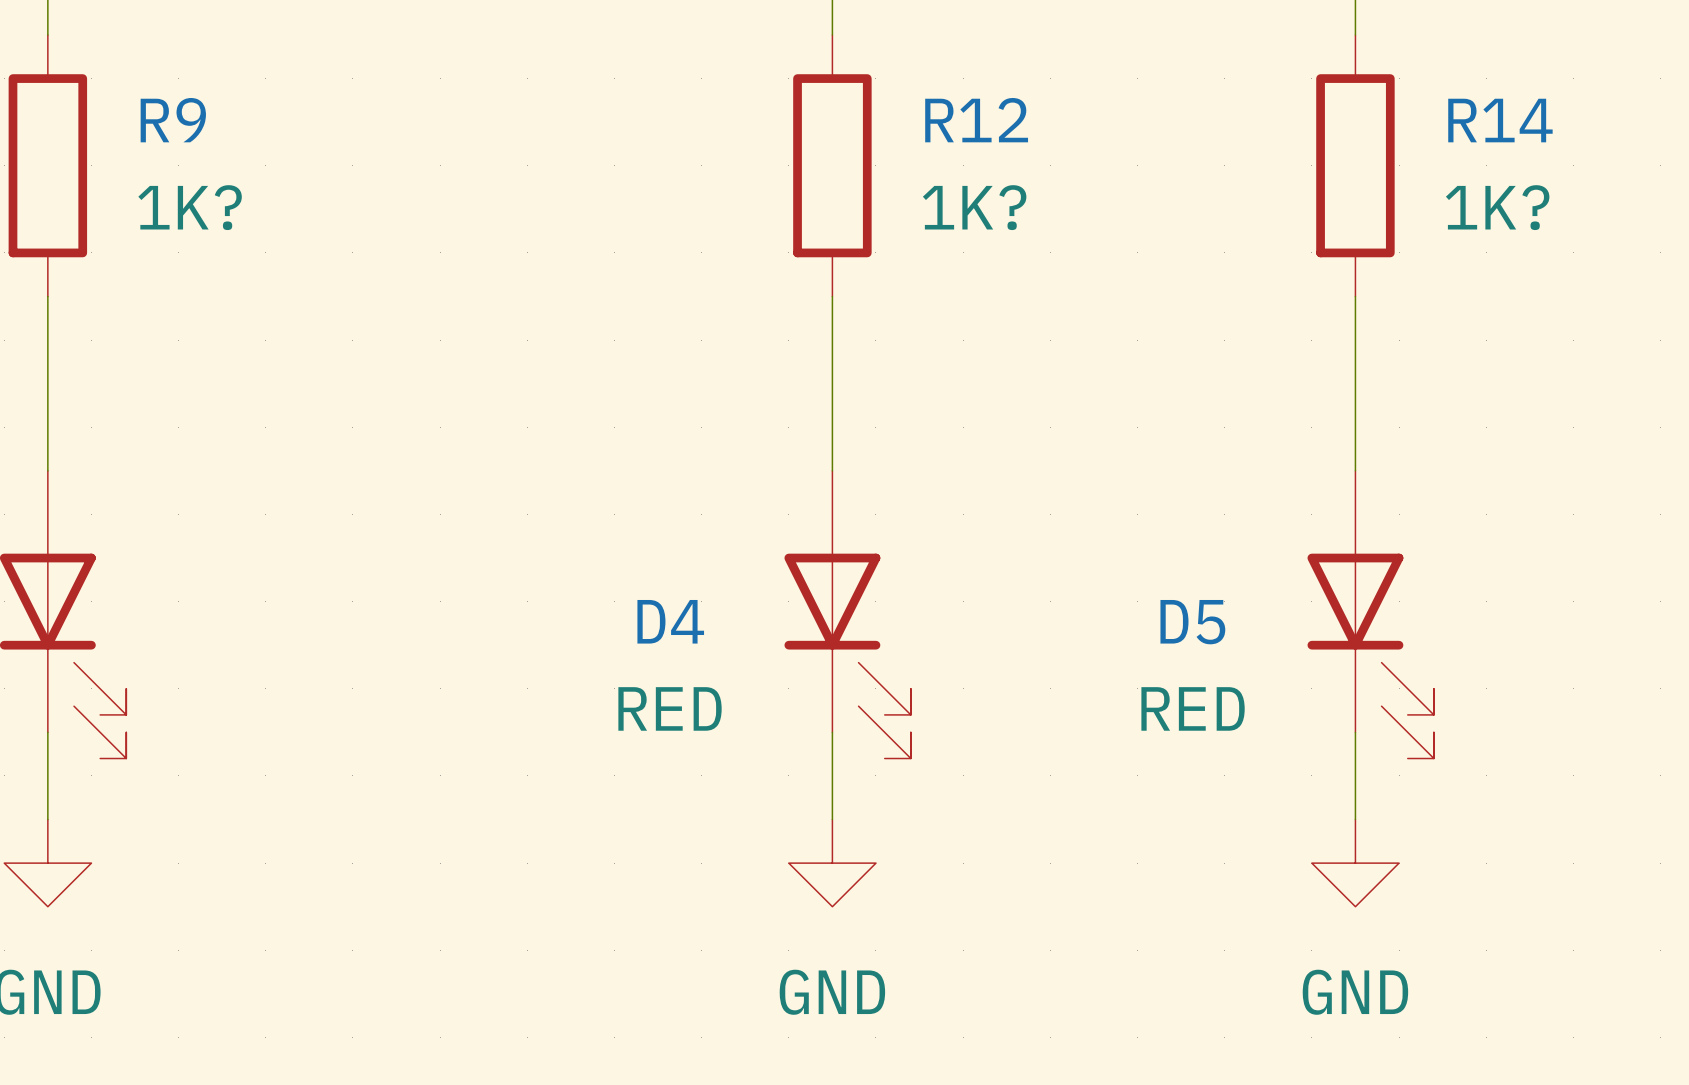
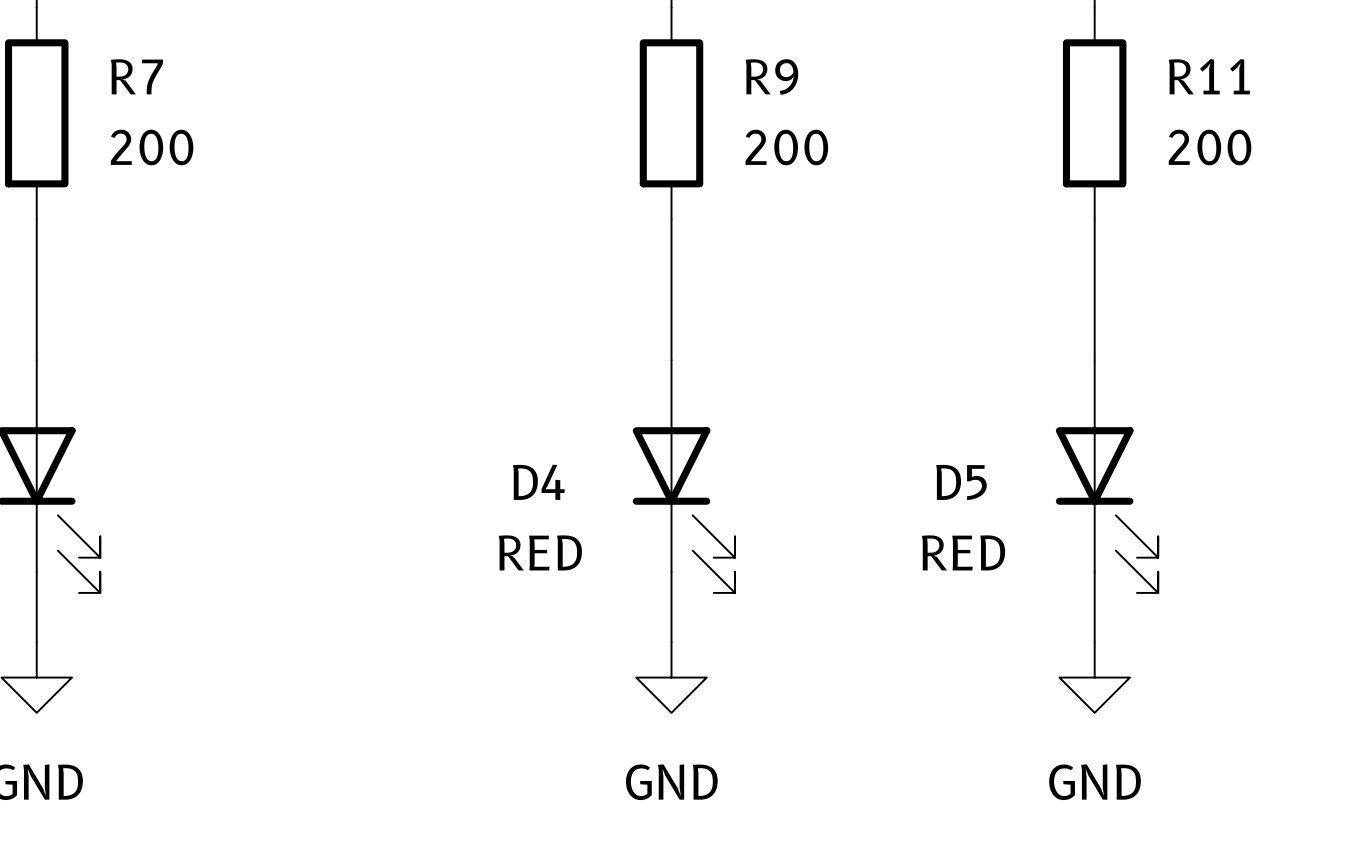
R9 name: R9 (173, 120) -> R7 (136, 76)
R12 name: R12 (976, 120) -> R9 (771, 76)
R14 name: R14 (1500, 120) -> R11 (1209, 76)
R9 value: 1K? (190, 207) -> 200 (152, 147)
R12 value: 1K? (974, 207) -> 200 (786, 147)
R14 value: 1K? (1497, 207) -> 200 (1210, 147)

